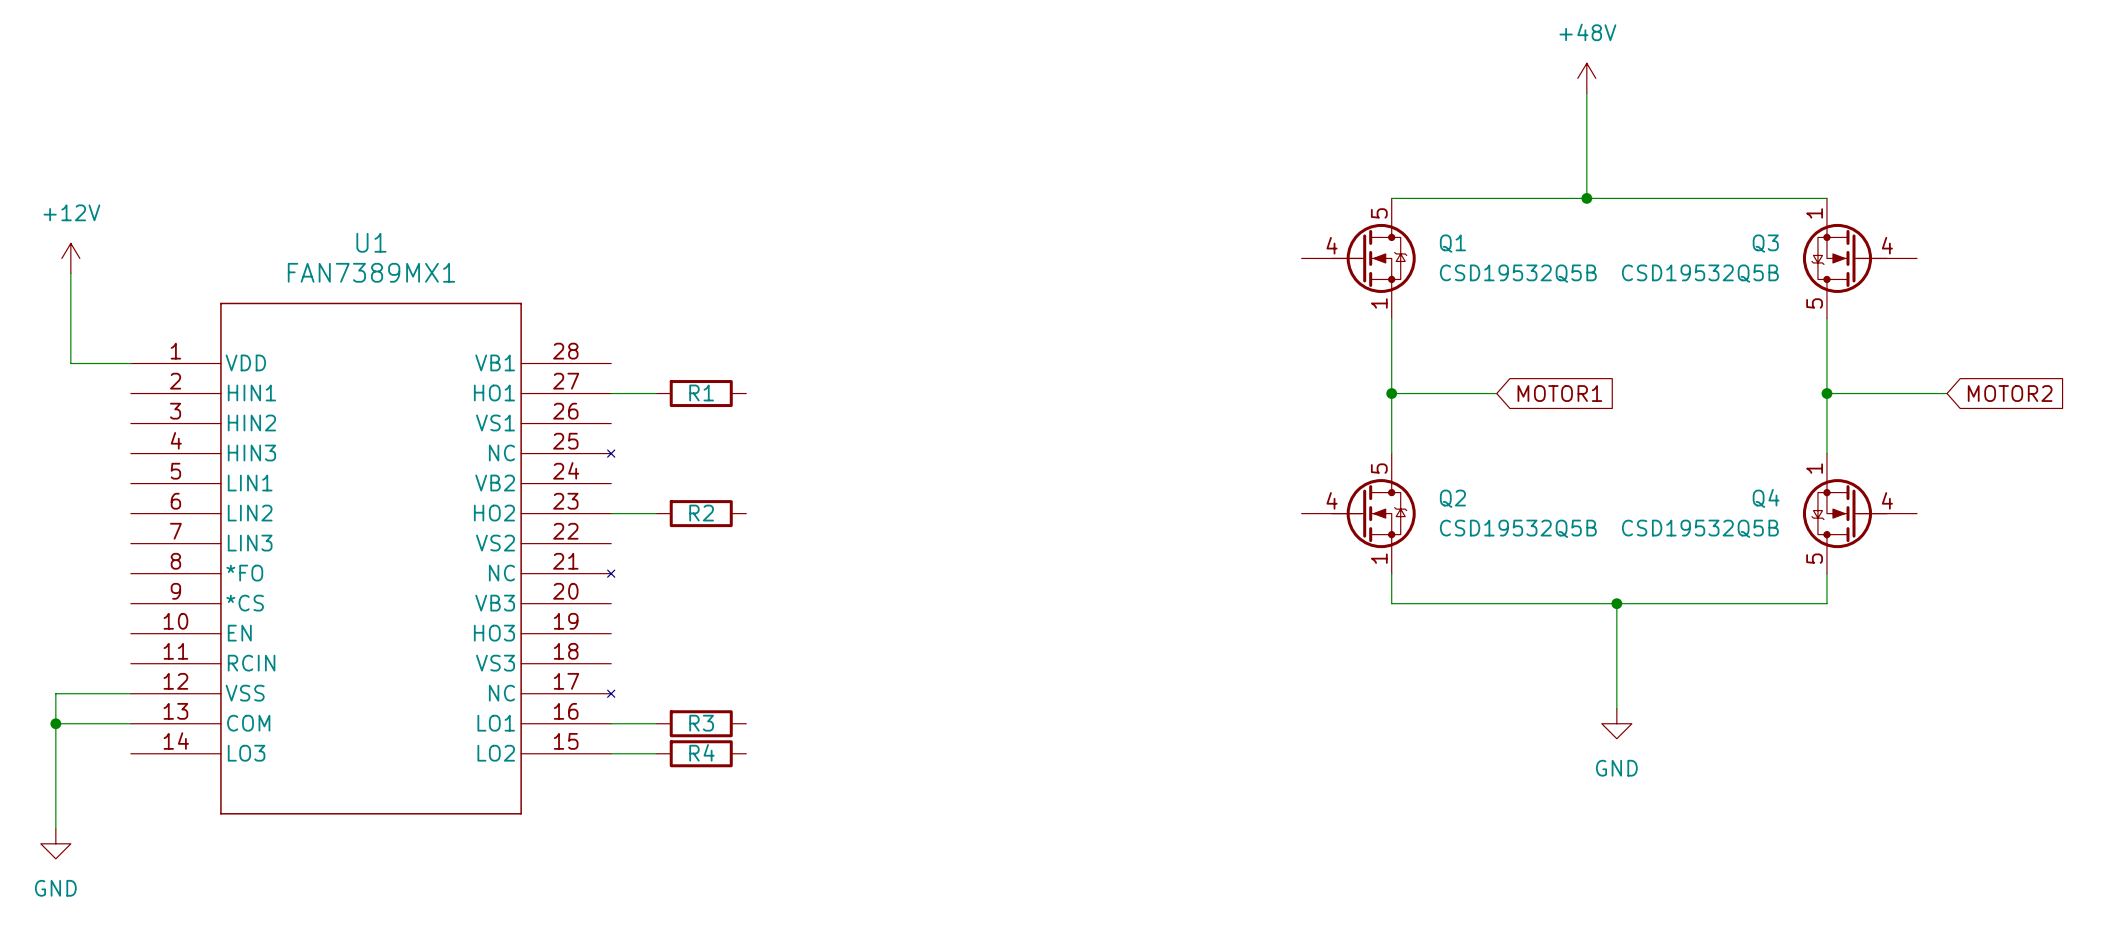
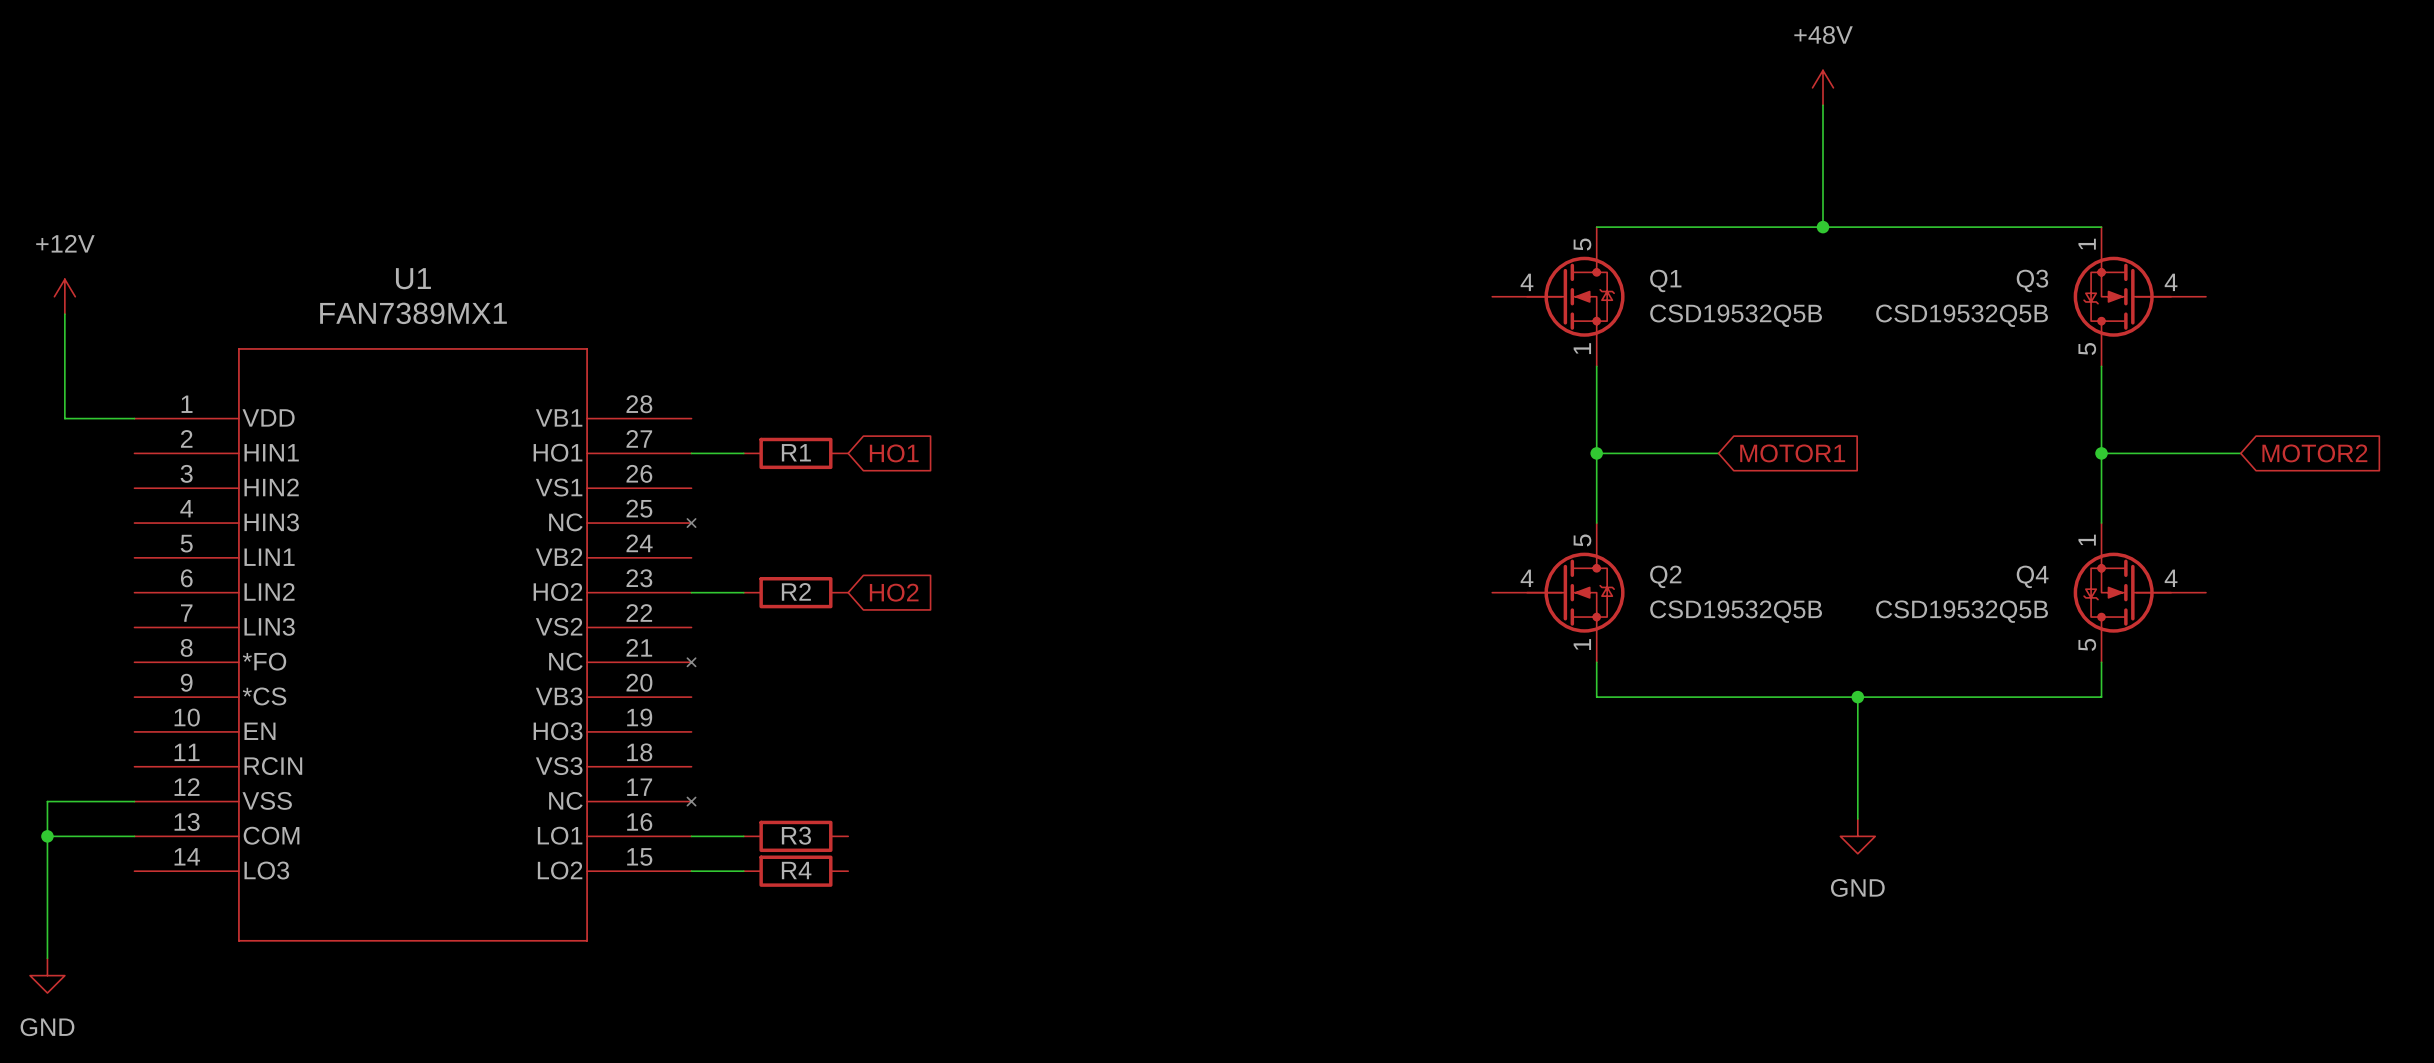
global label: none -> HO1 (894, 453)
global label: none -> HO2 (894, 592)

